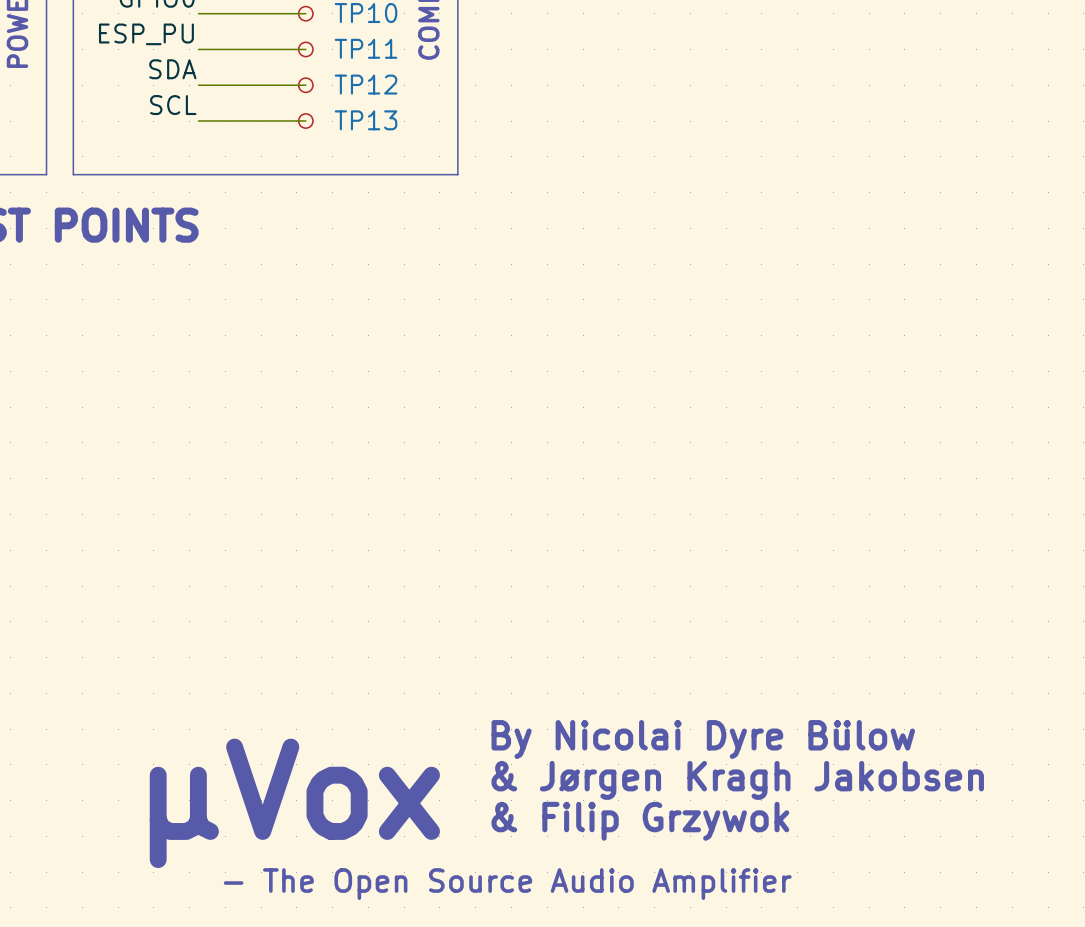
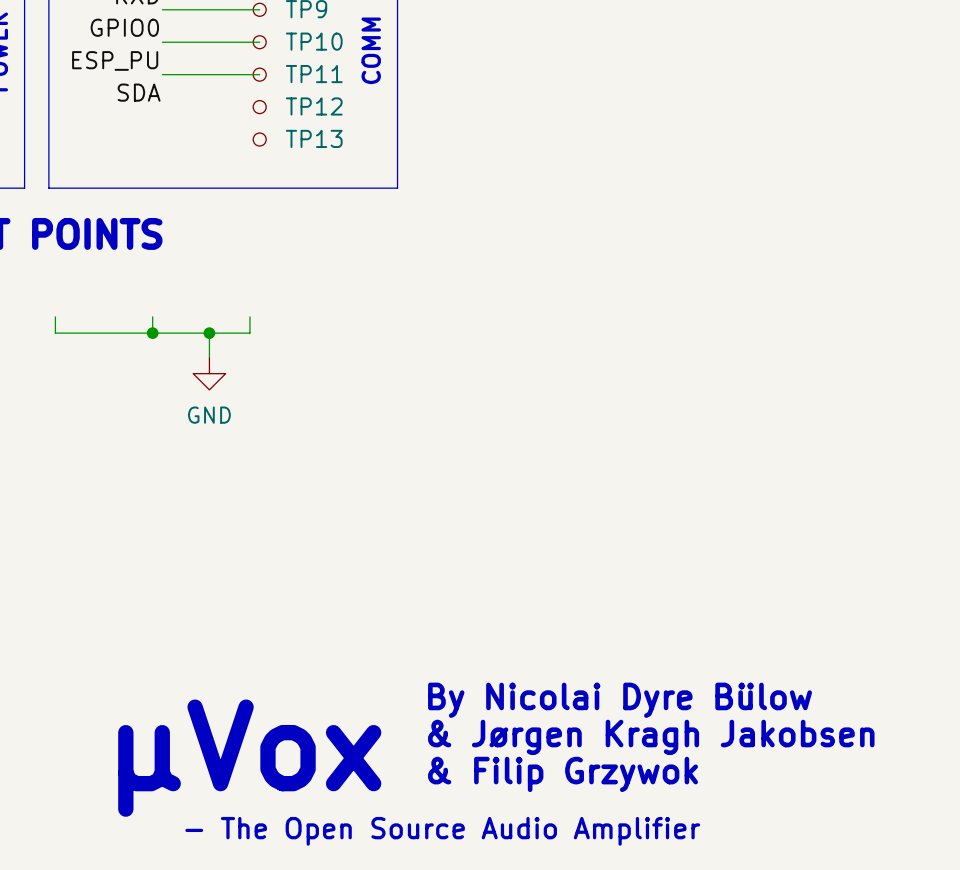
wire: (198, 85) (305, 85) -> none
label: SCL (173, 105) -> none
wire: (198, 121) (305, 121) -> none
wire: none -> (55, 316) (55, 333) (249, 333) (249, 316)
wire: none -> (152, 316) (152, 333)
junction: none -> (152, 333)
wire: none -> (209, 333) (209, 357)
junction: none -> (209, 333)
power symbol: none -> GND (209, 373)

